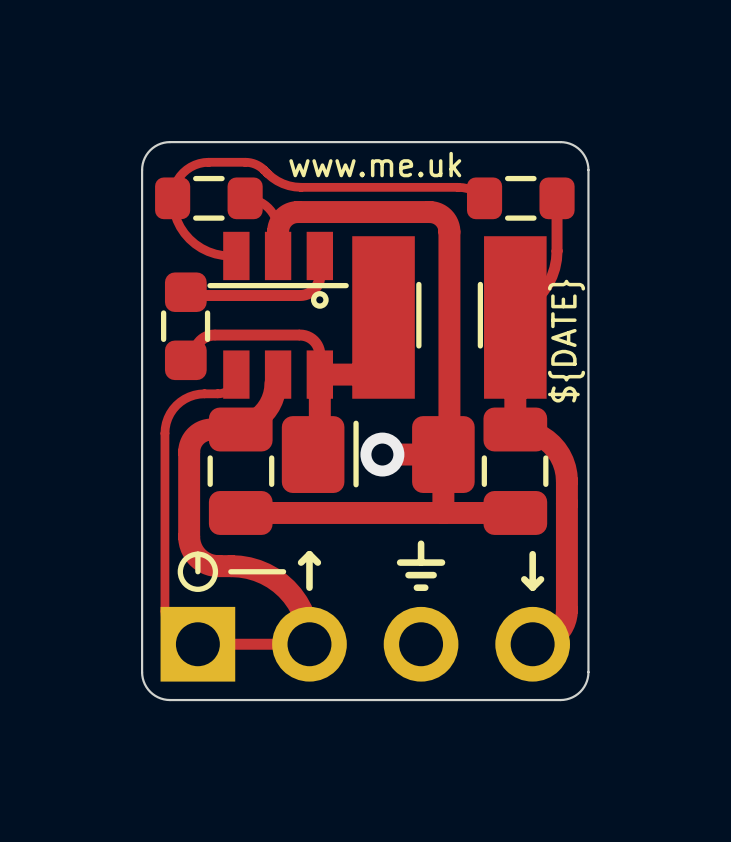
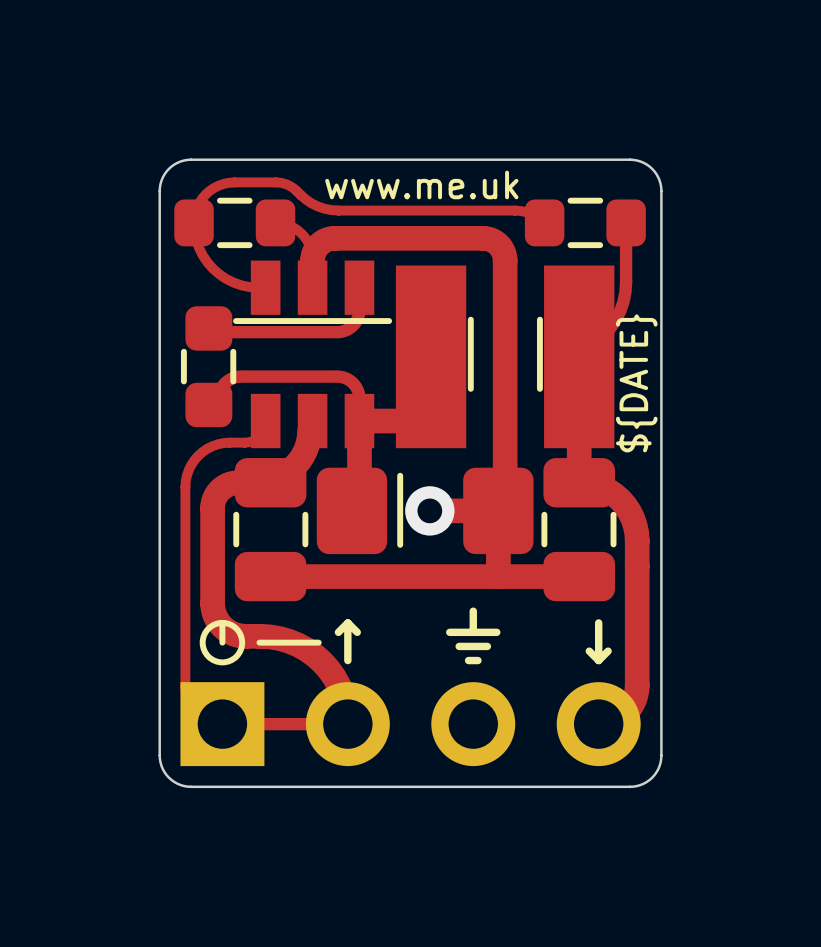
part footprint: [164, 201, 548, 535] -> [185, 225, 616, 602]

